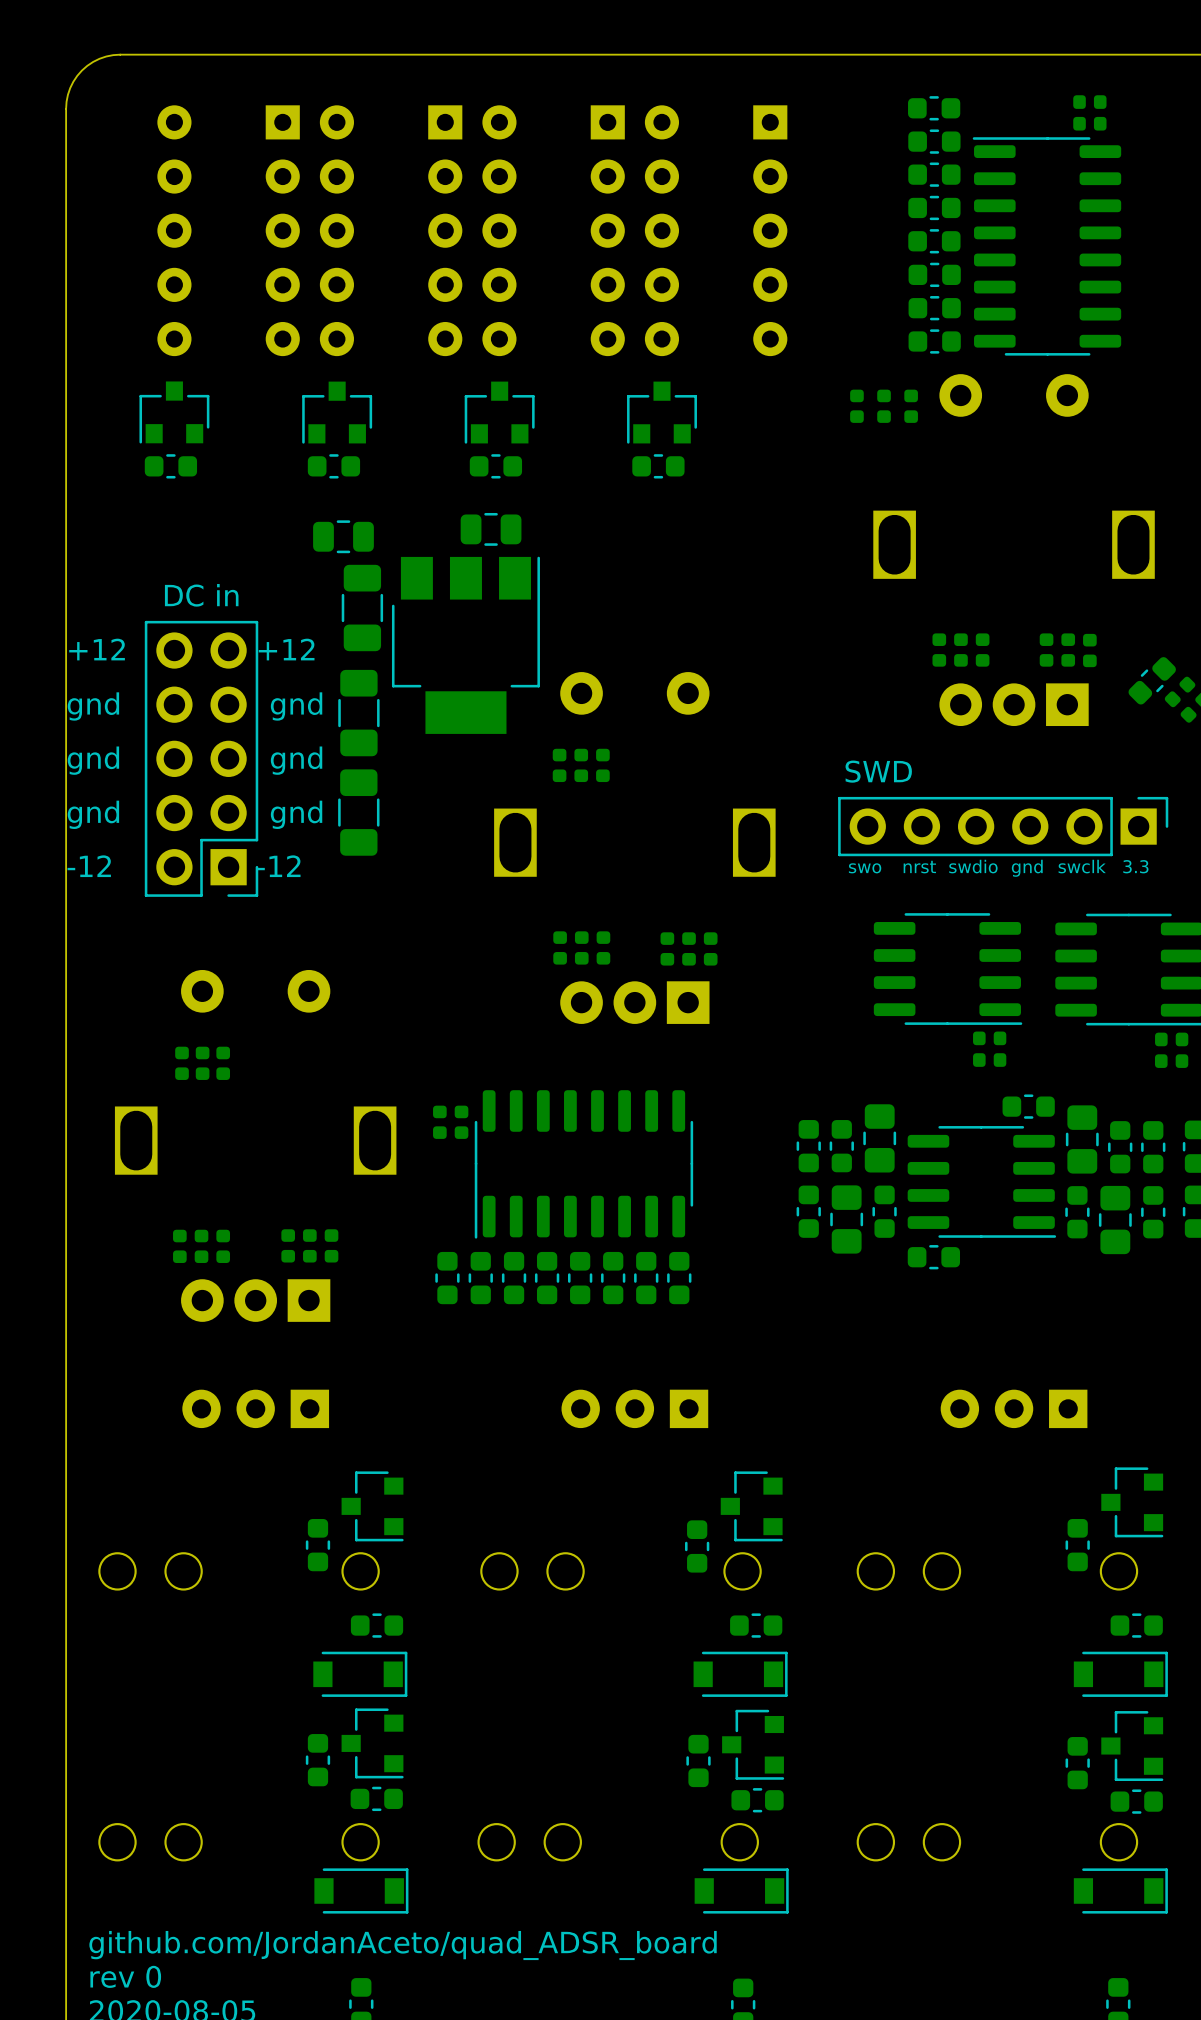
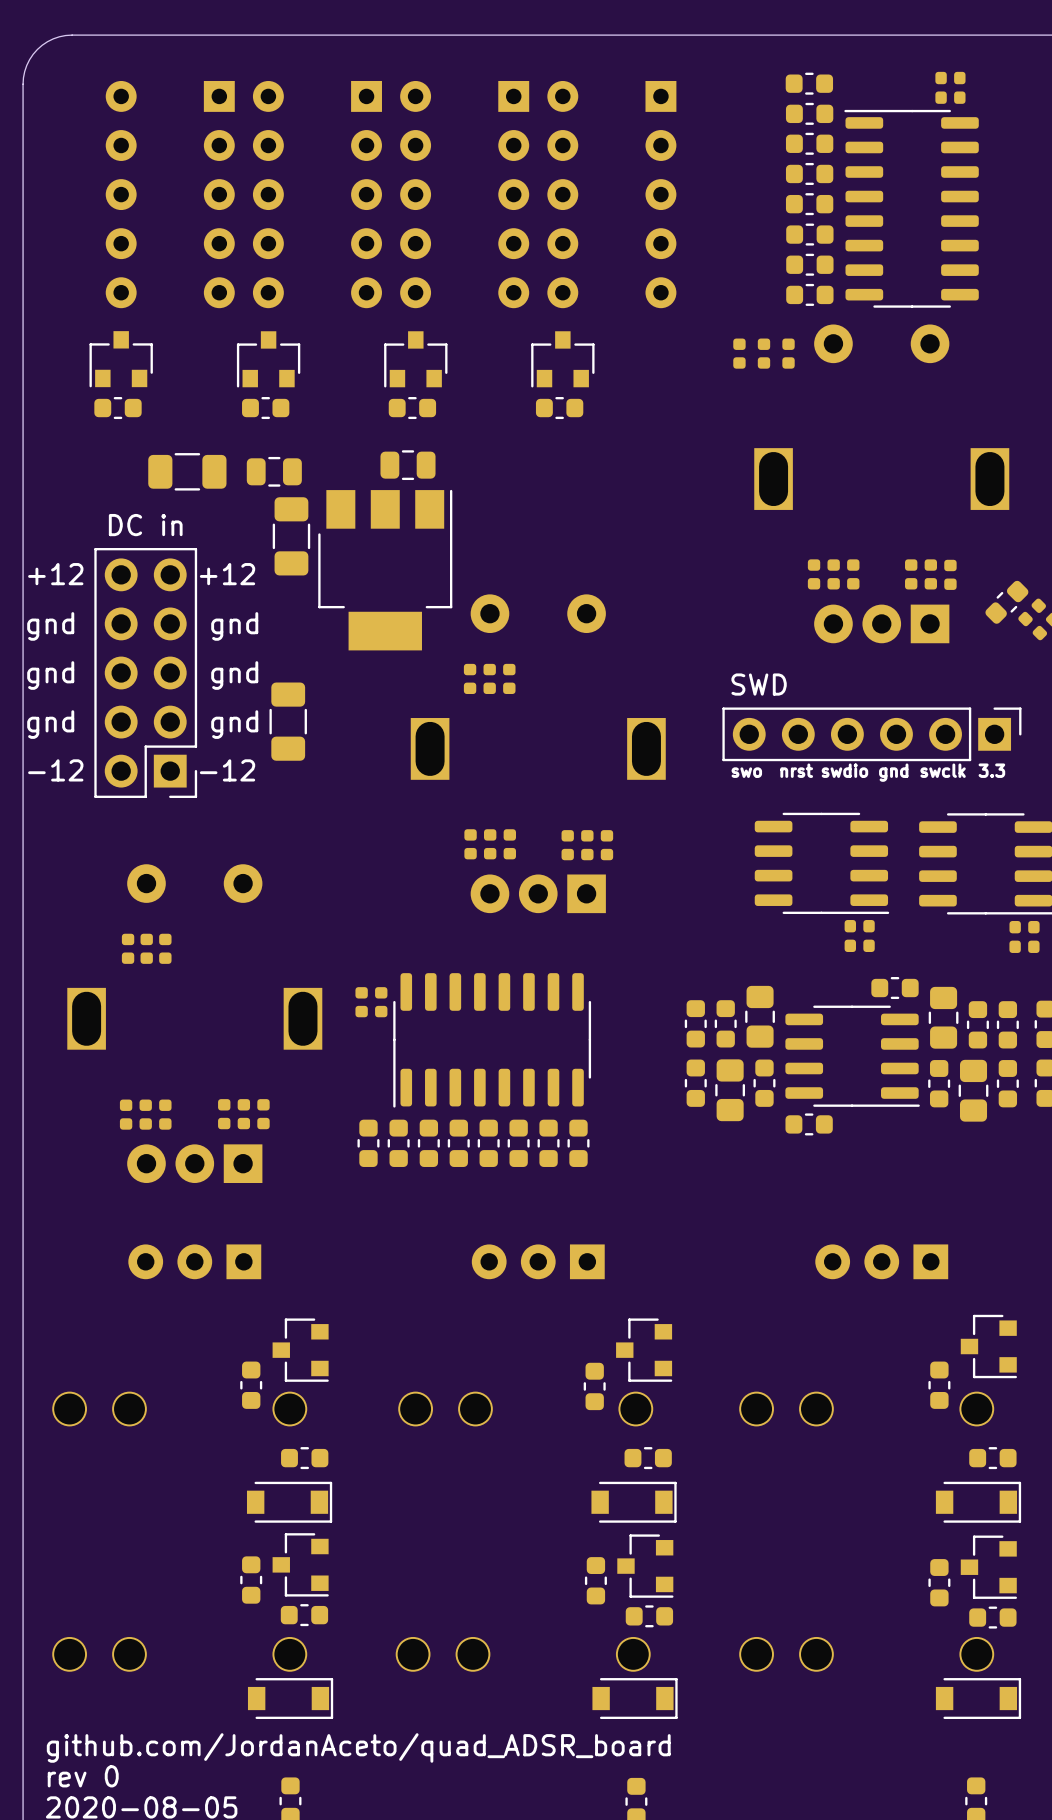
part rotation: 0° (358, 713) -> 90° clockwise (187, 471)
part position: (358, 713) -> (187, 471)

